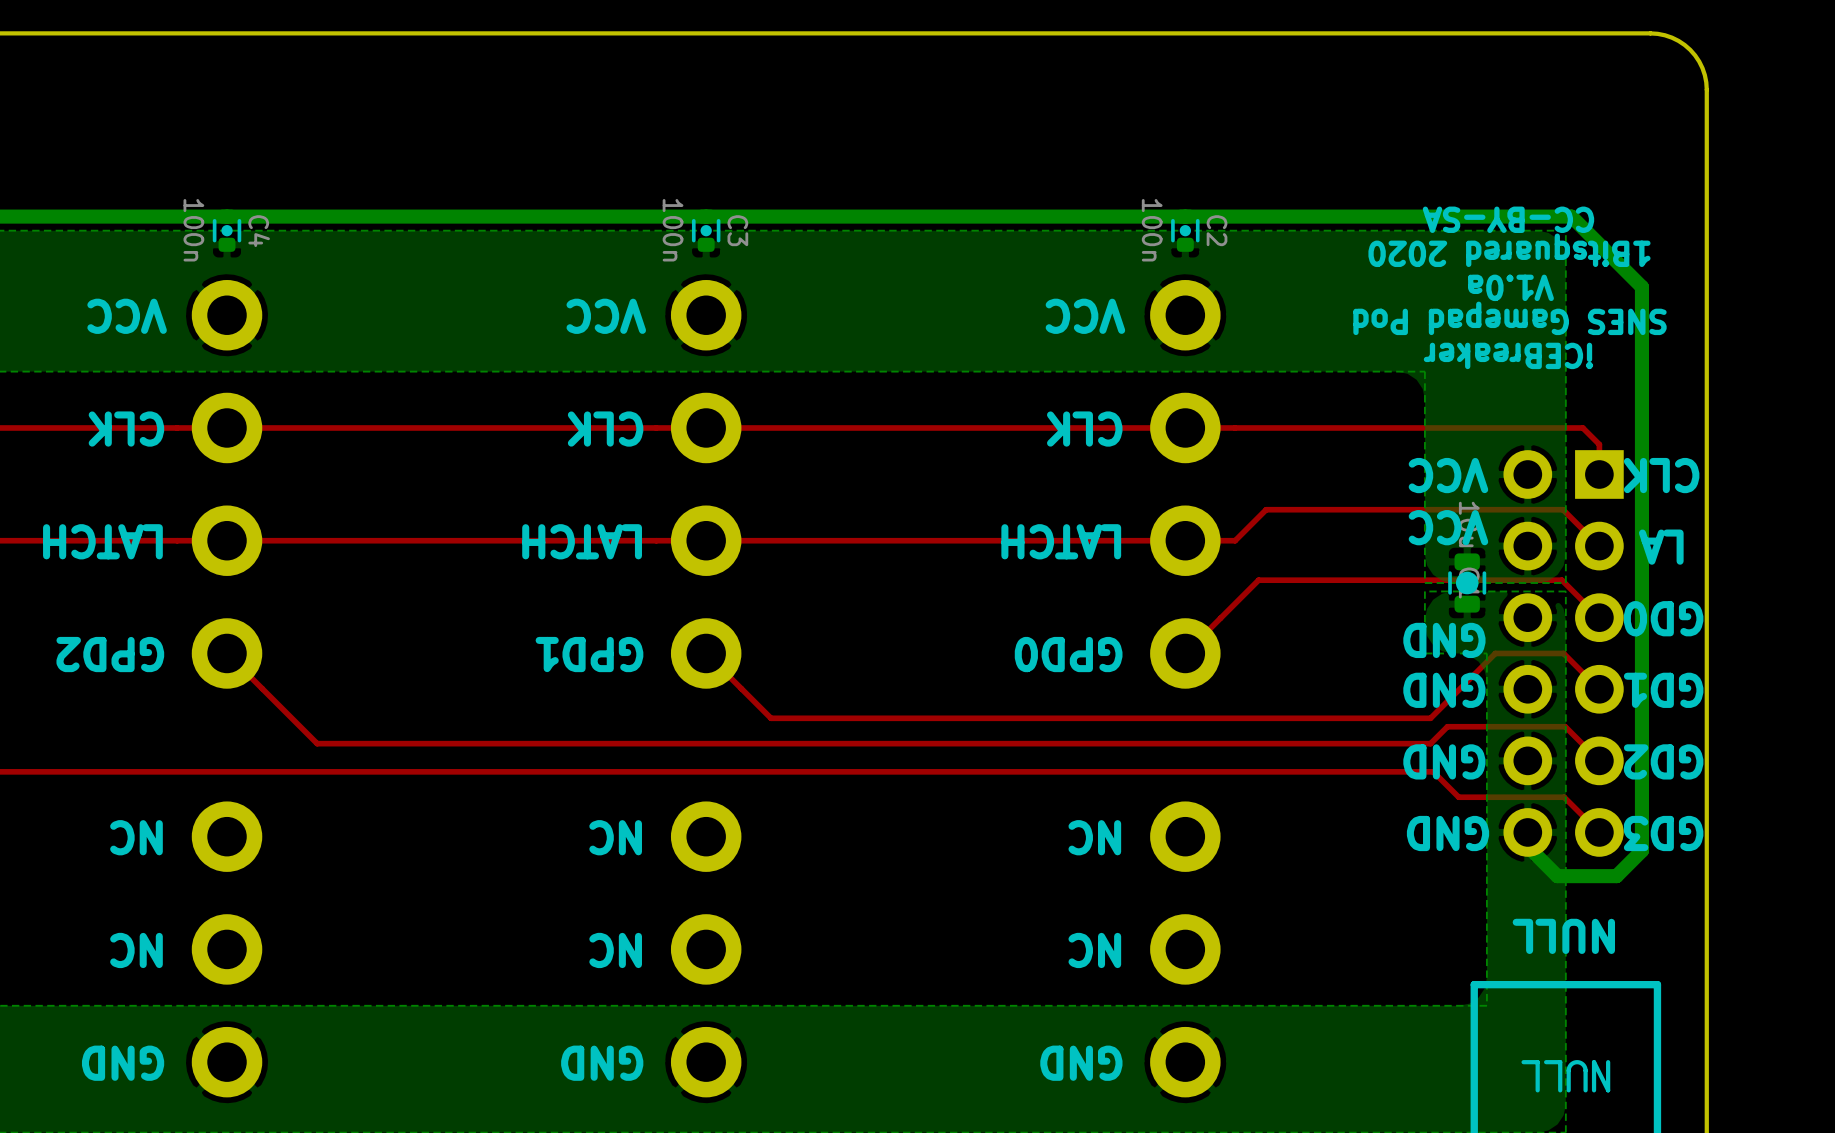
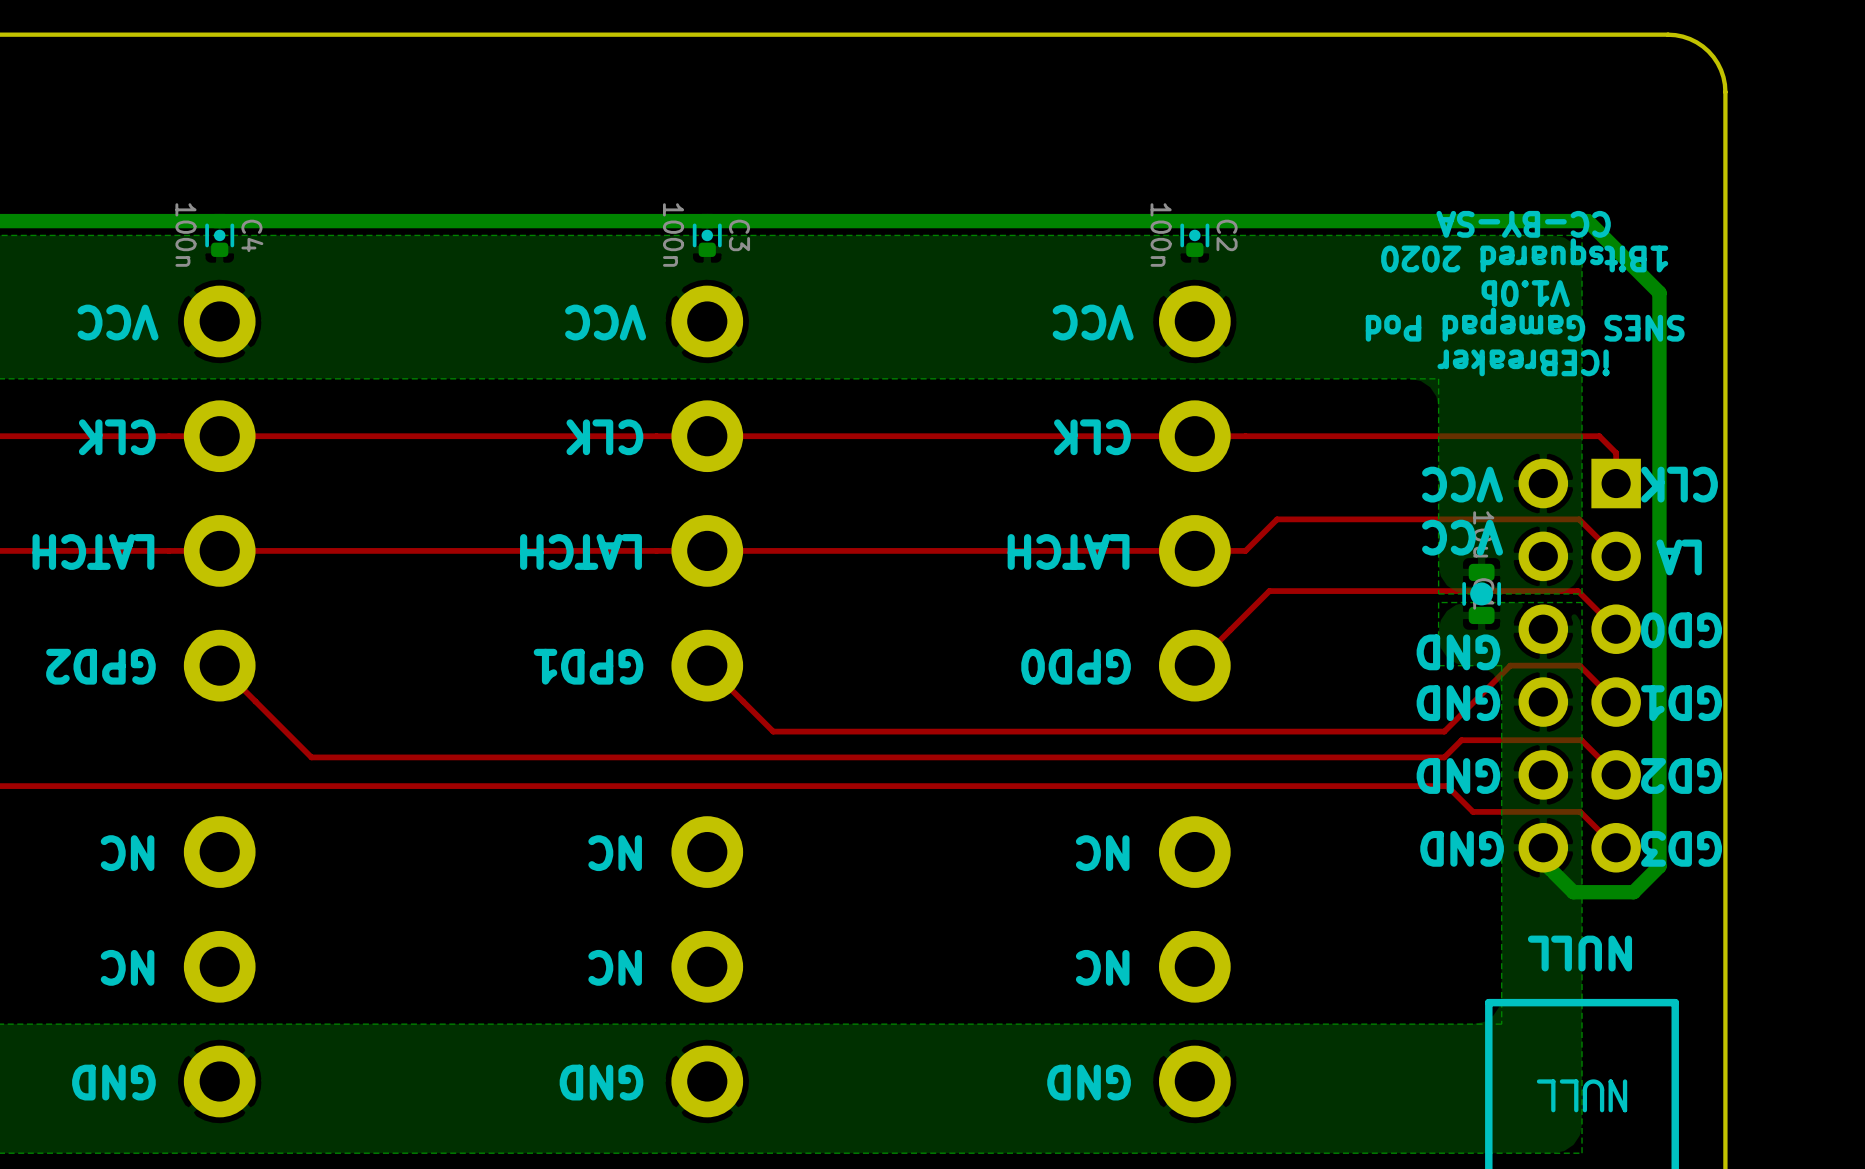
text: V1.0a (1510, 287) -> V1.0b (1525, 293)

